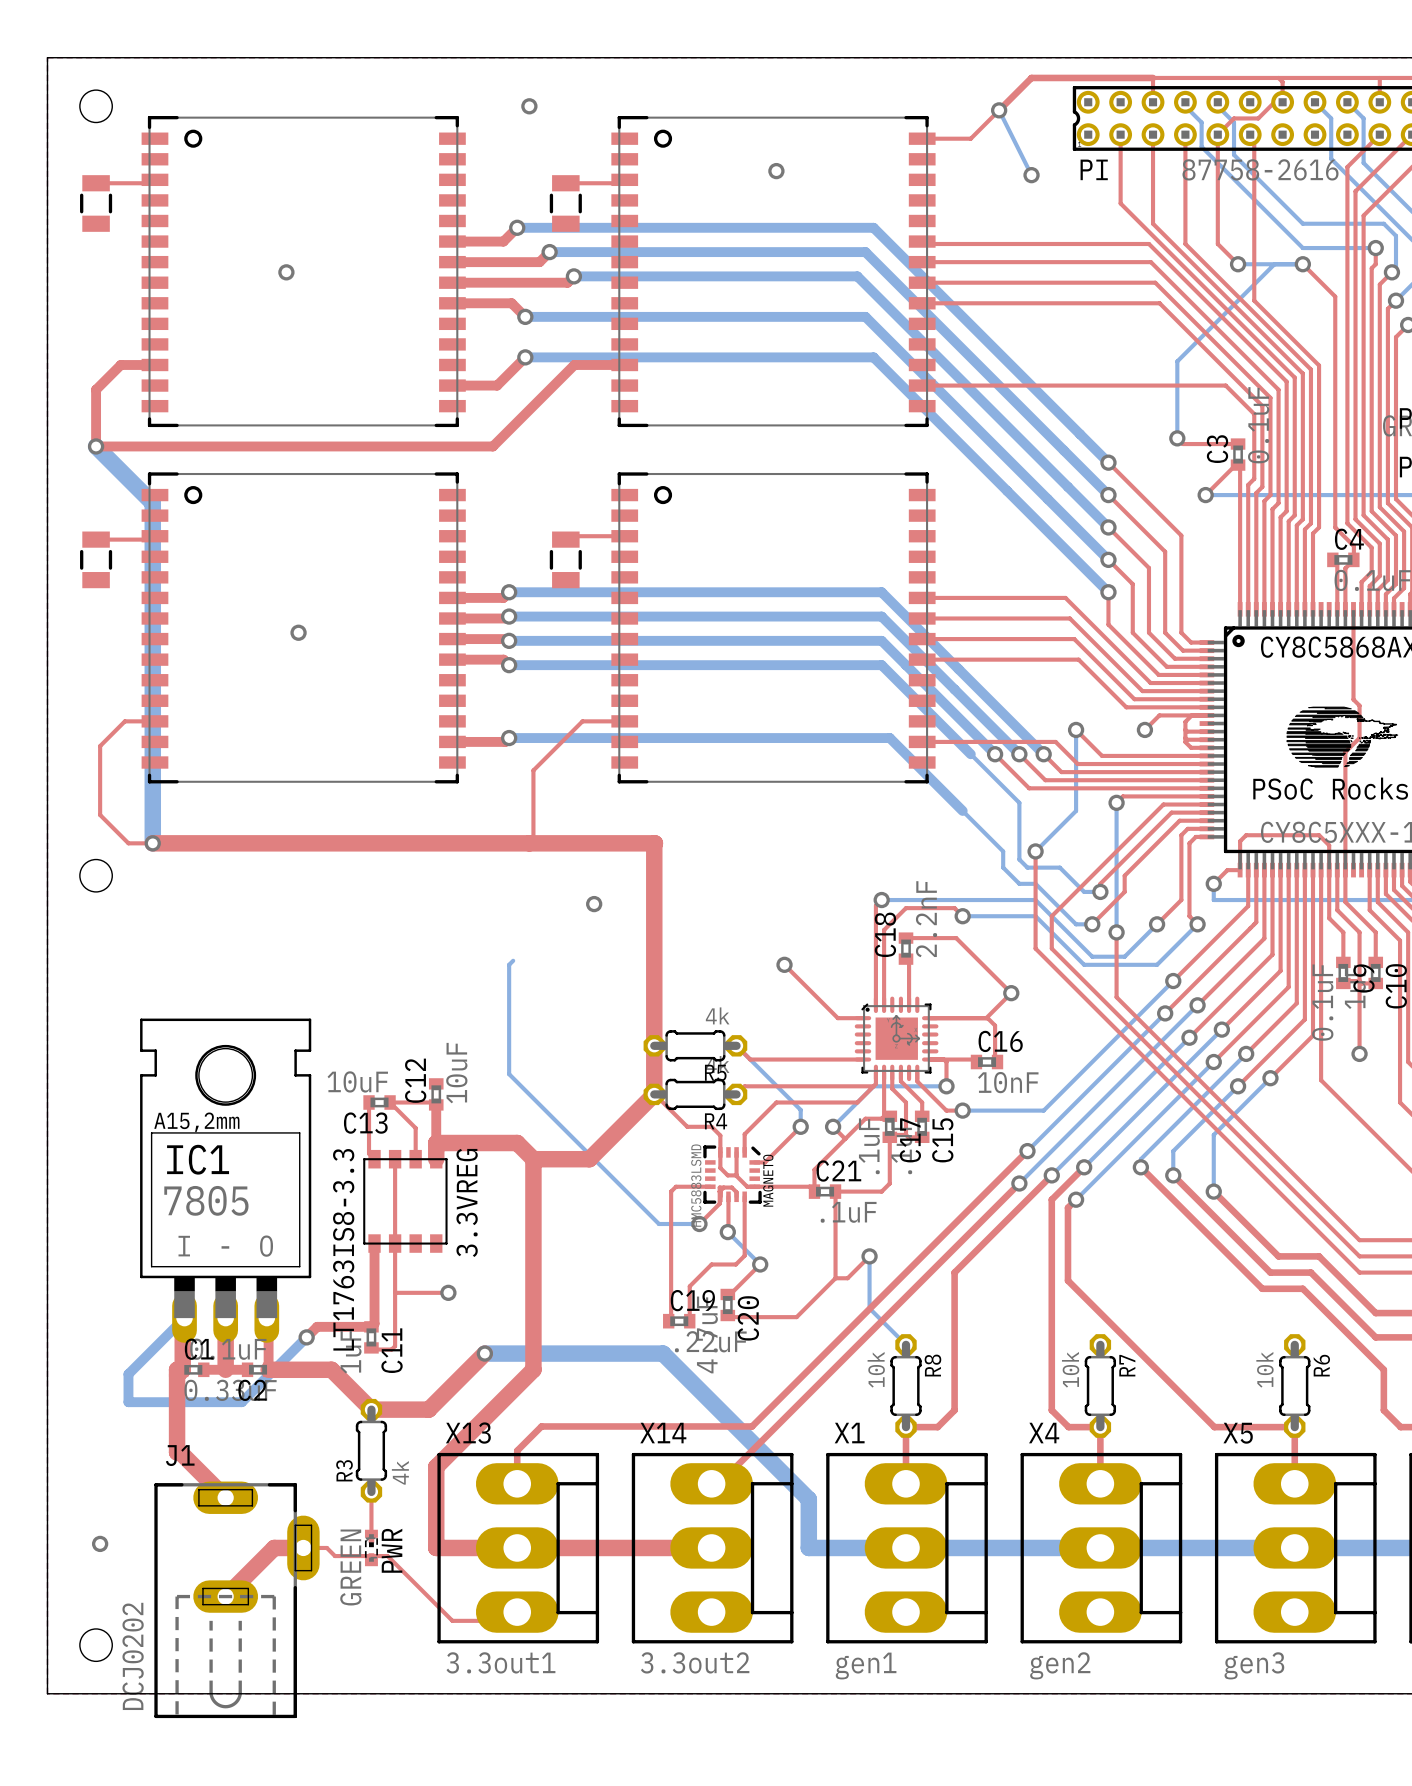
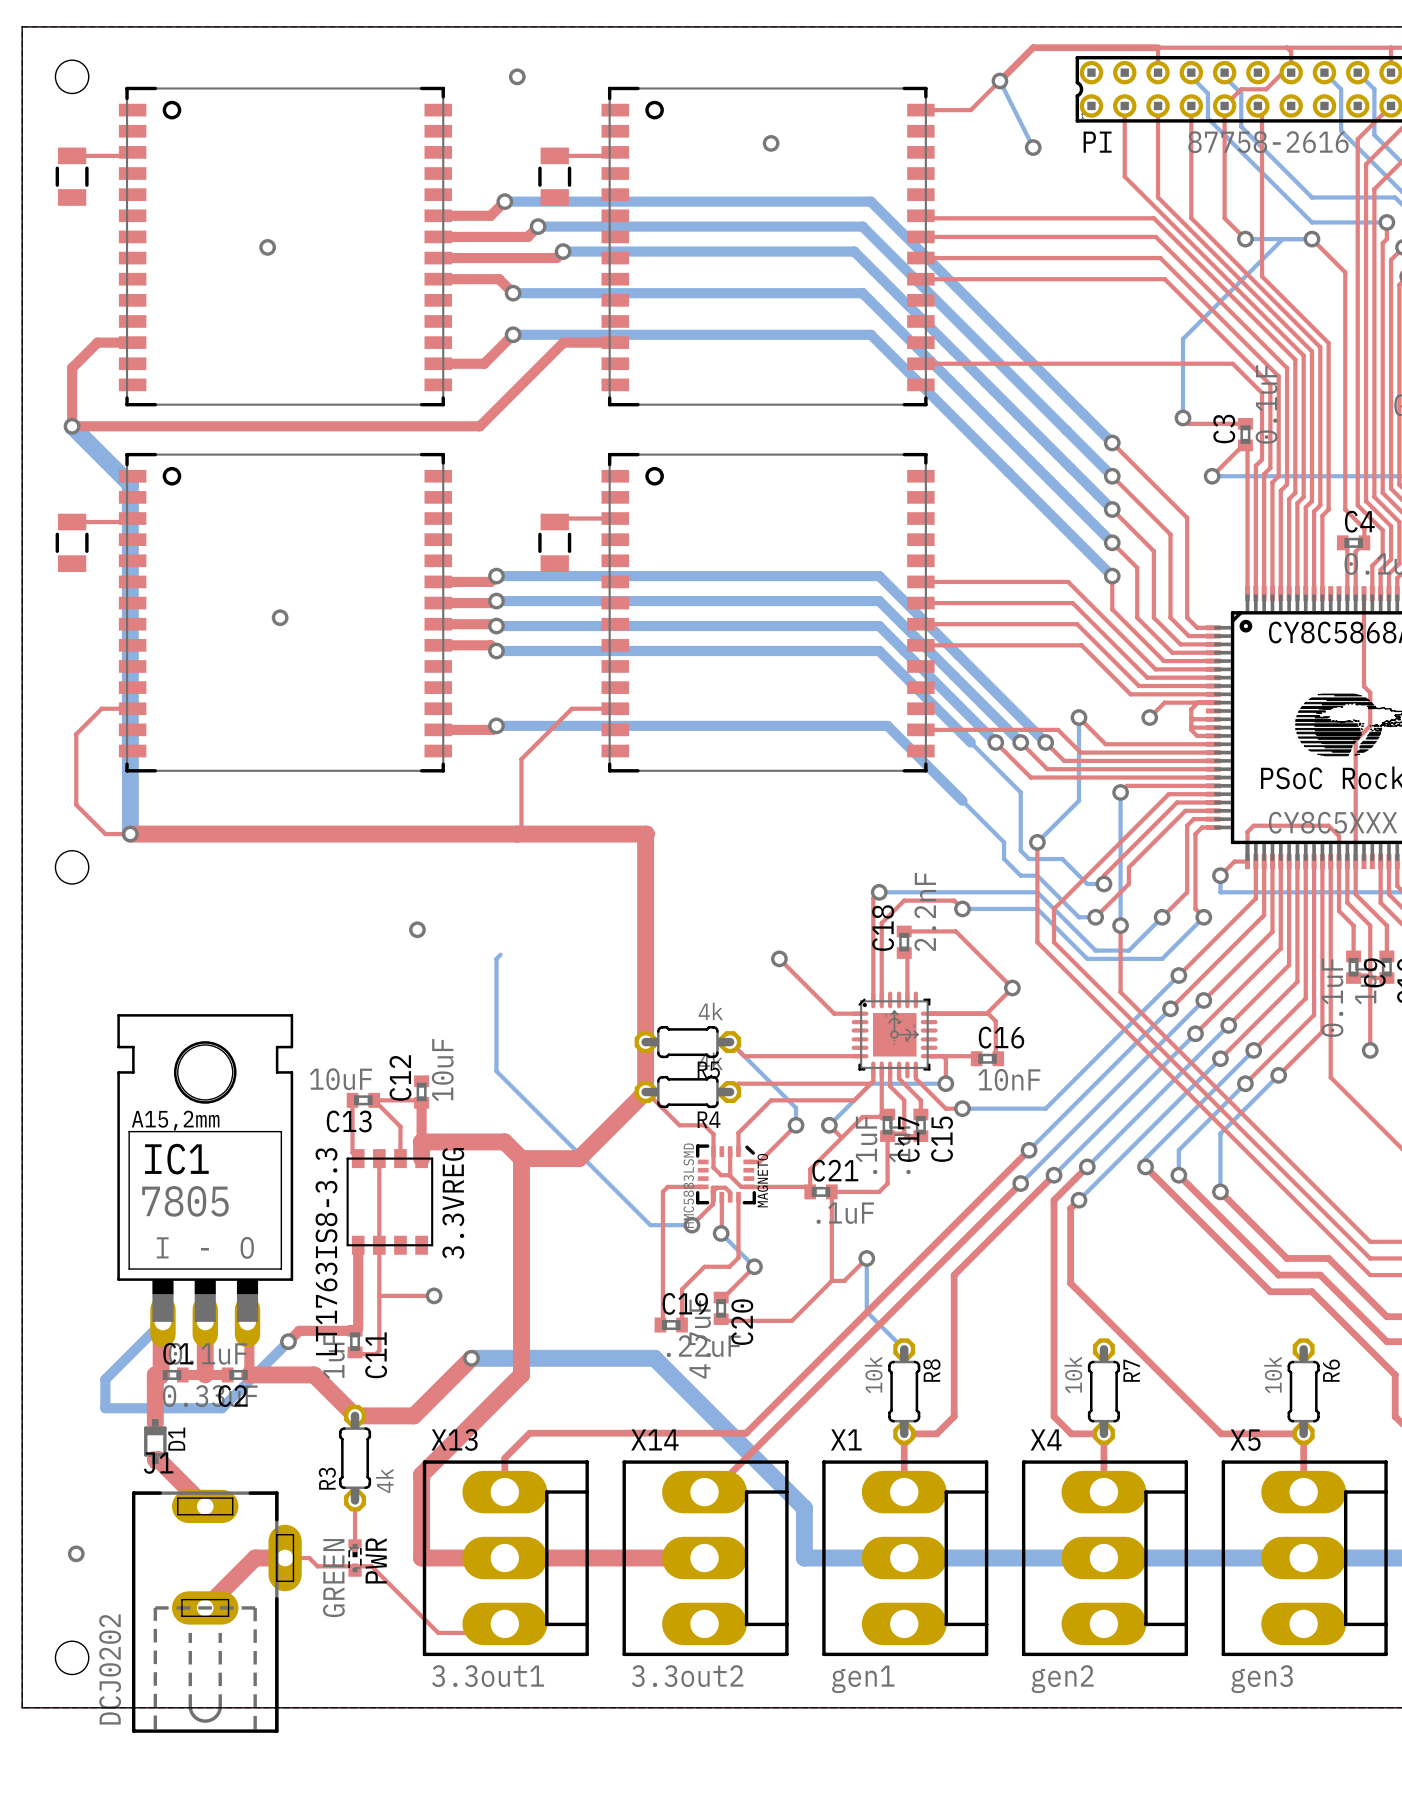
via: (594, 904) -> none
via: none -> (417, 929)
top track: (177, 1416) (177, 1452) -> none
D1: none -> (155, 1441)

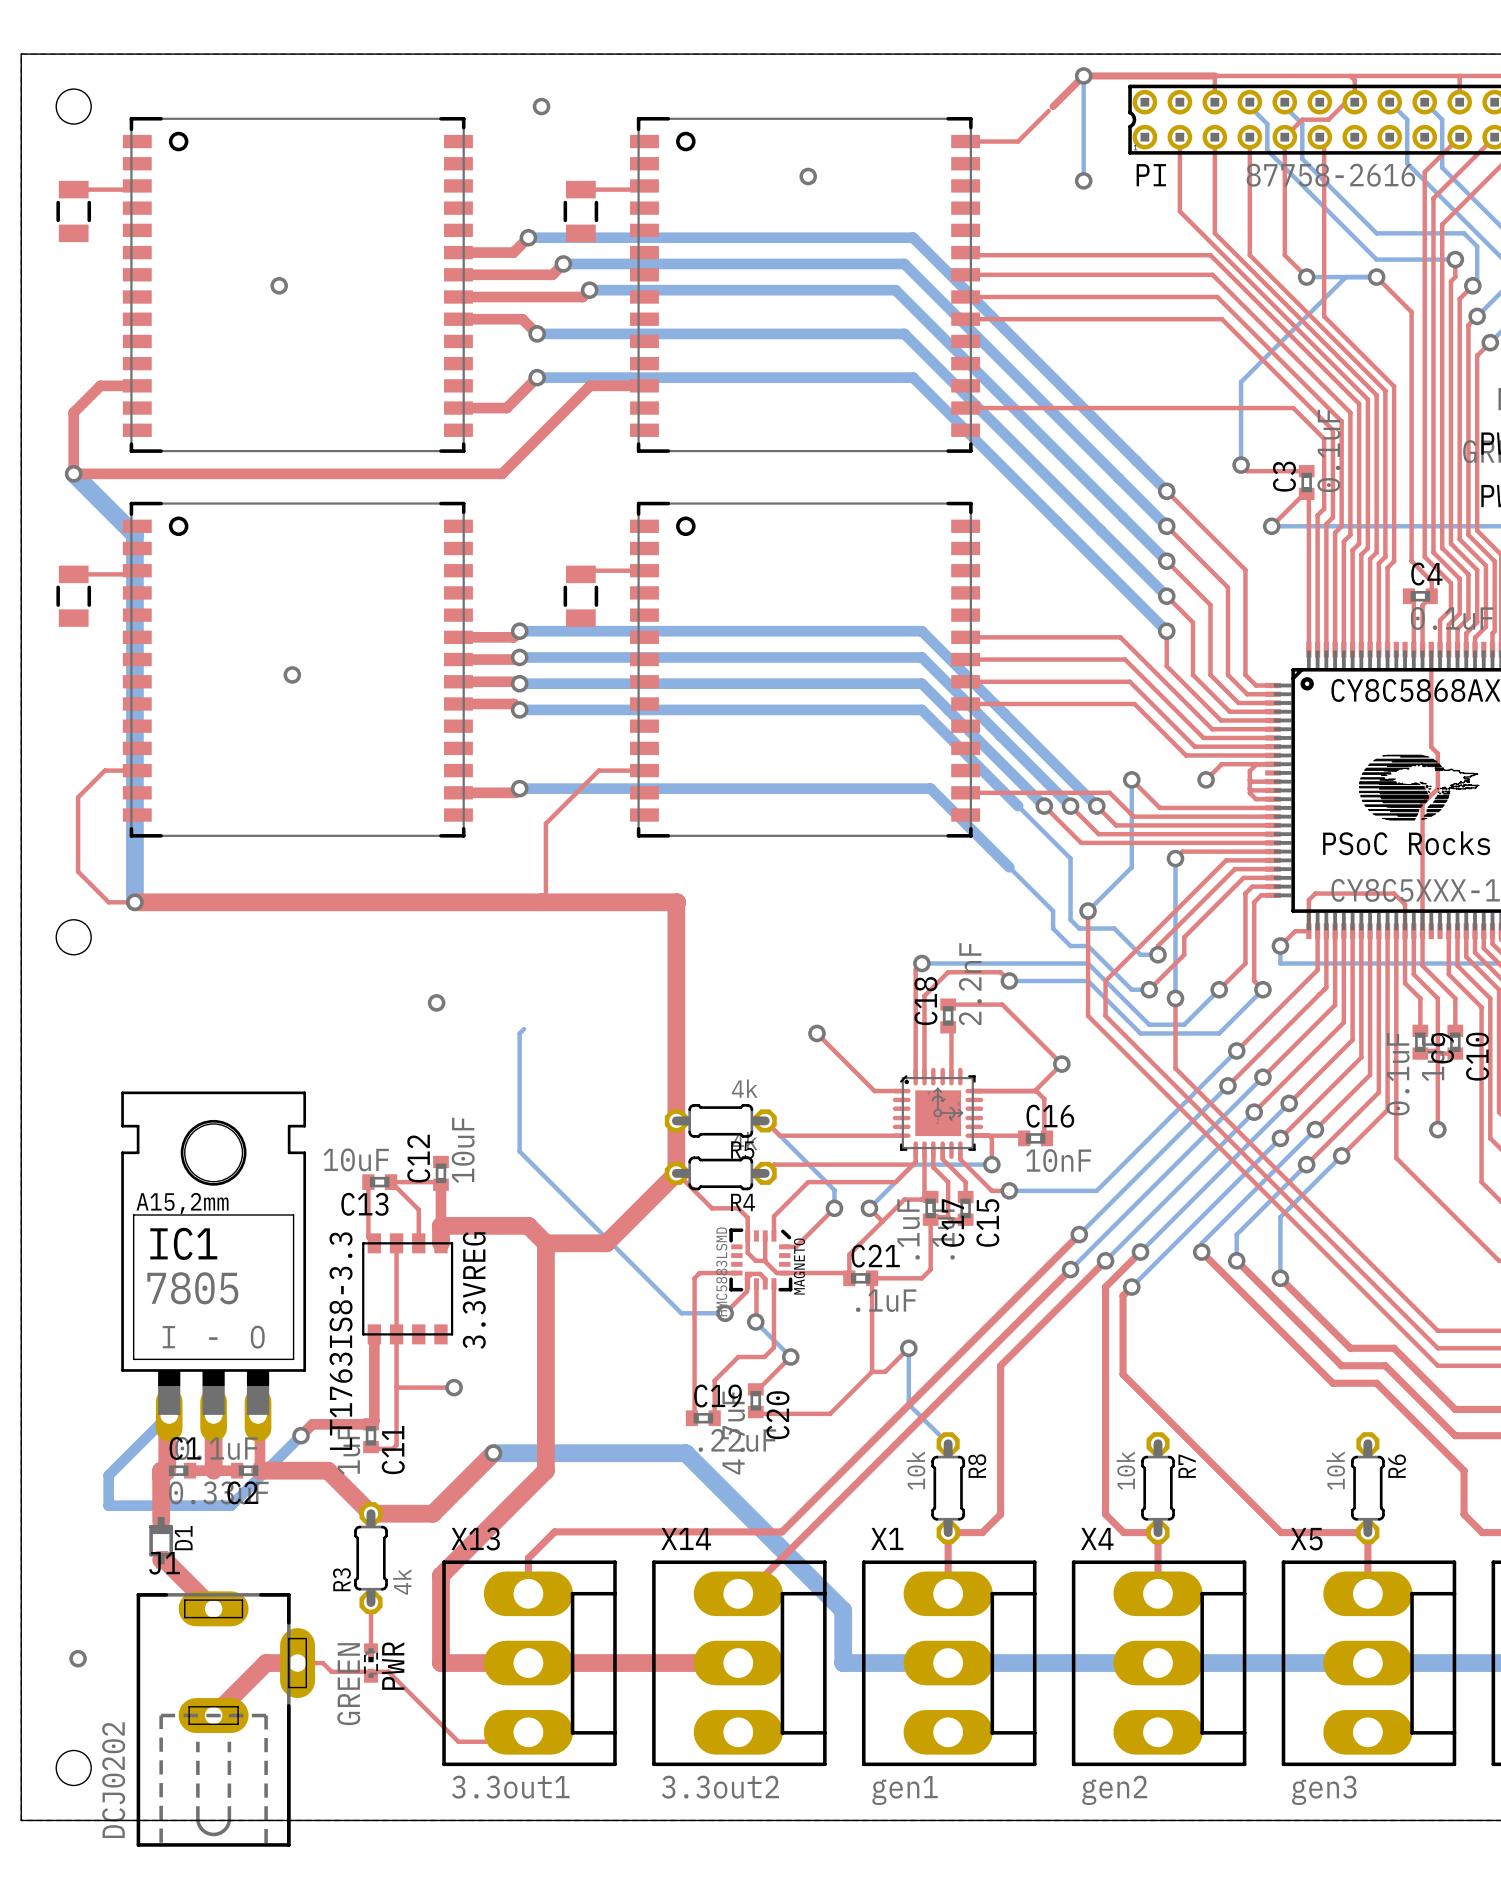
bottom track: (999, 80) (1033, 147) -> (1083, 75) (1083, 180)
via position: (999, 80) -> (1083, 75)

